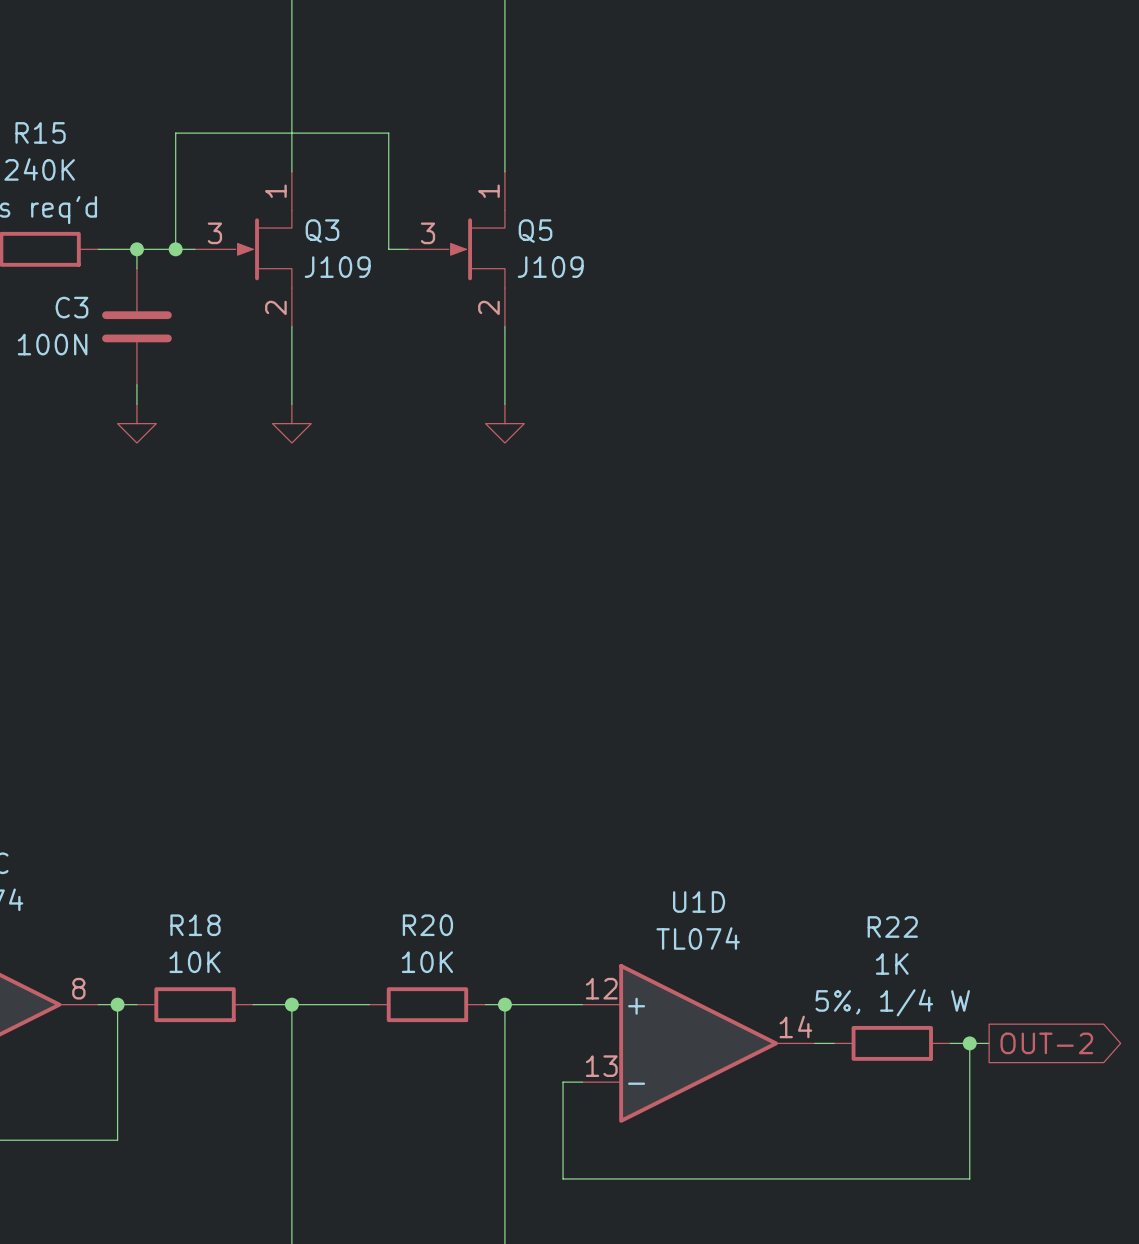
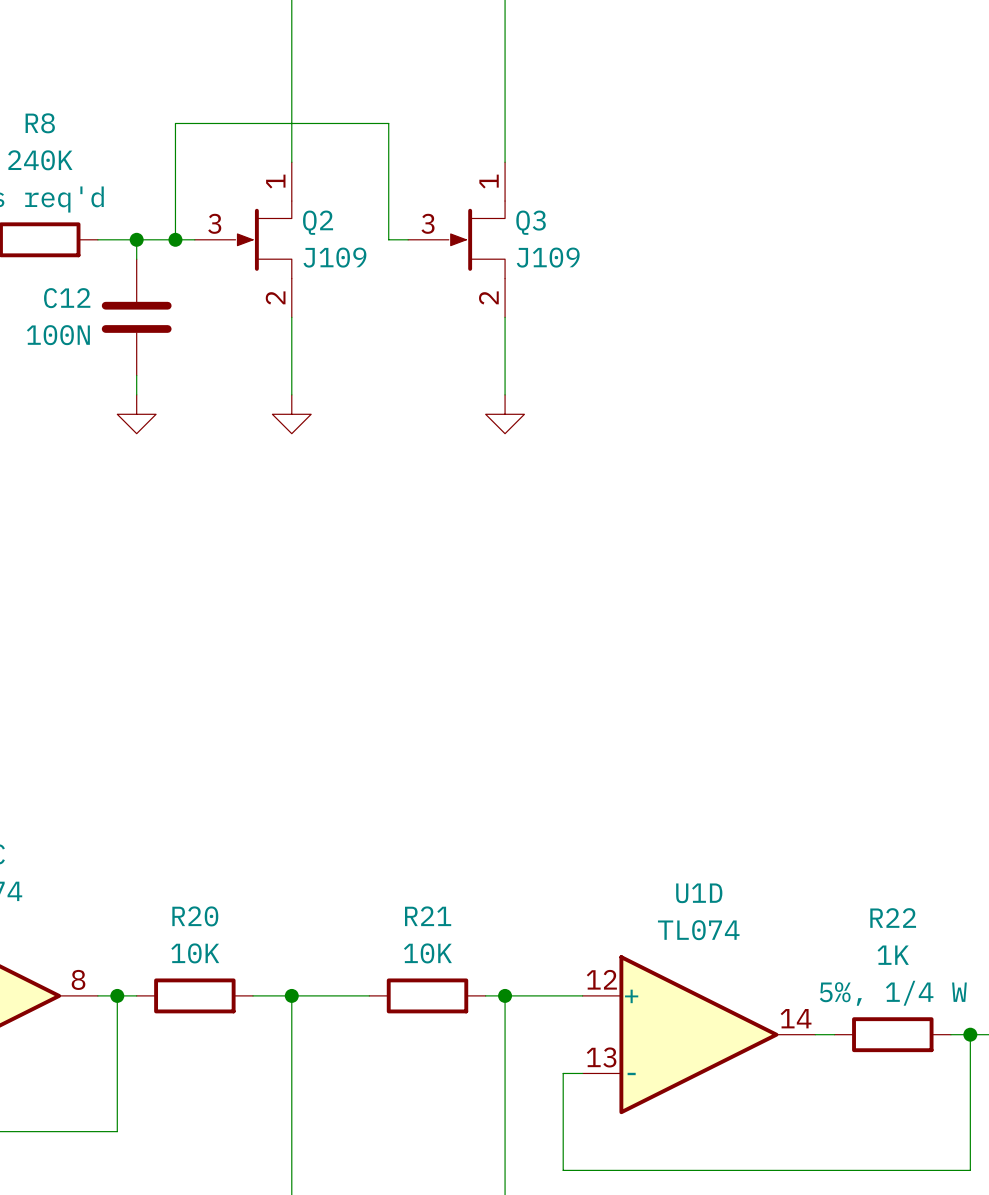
R15 name: R15 (40, 132) -> R8 (40, 123)
Q3 name: Q3 (322, 231) -> Q2 (318, 222)
Q5 name: Q5 (535, 231) -> Q3 (531, 222)
C3 name: C3 (71, 307) -> C12 (67, 298)
R18 name: R18 (195, 925) -> R20 (195, 916)
R20 name: R20 (427, 925) -> R21 (428, 916)

